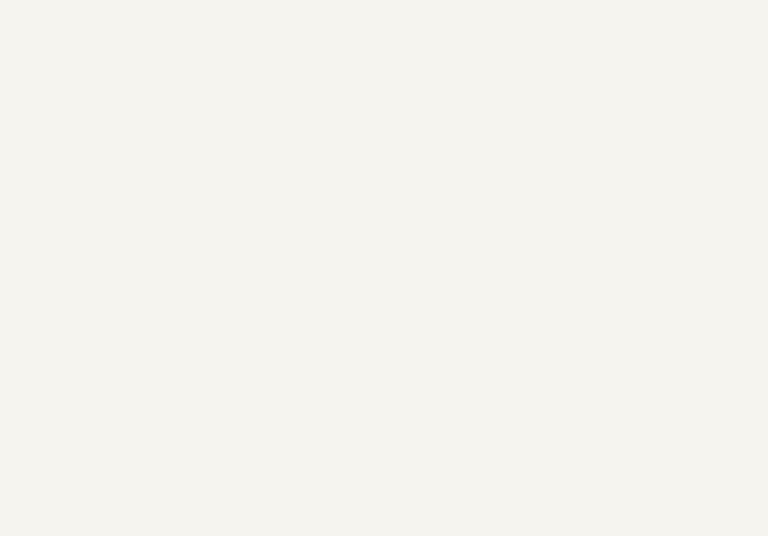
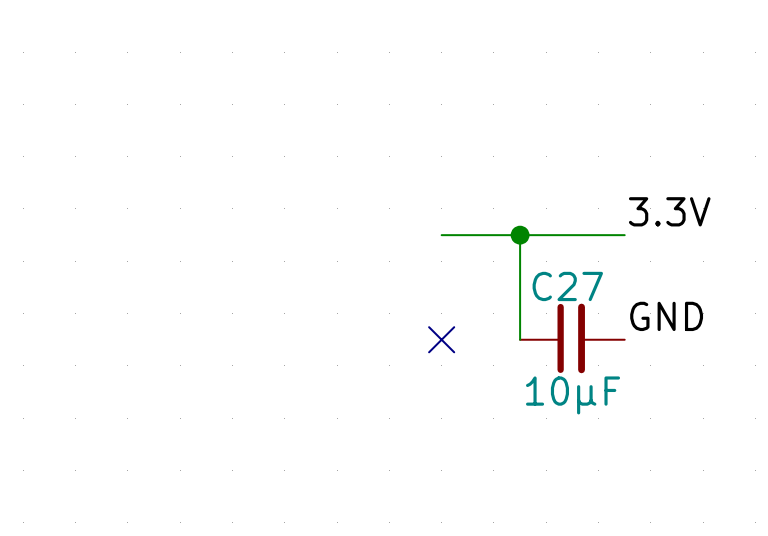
label: none -> 3.3V (669, 211)
wire: none -> (441, 235) (624, 235)
wire: none -> (520, 235) (520, 339)
junction: none -> (520, 235)
label: none -> GND (666, 316)
C27: none -> 10μF (572, 338)
no-connect mark: none -> (441, 339)

